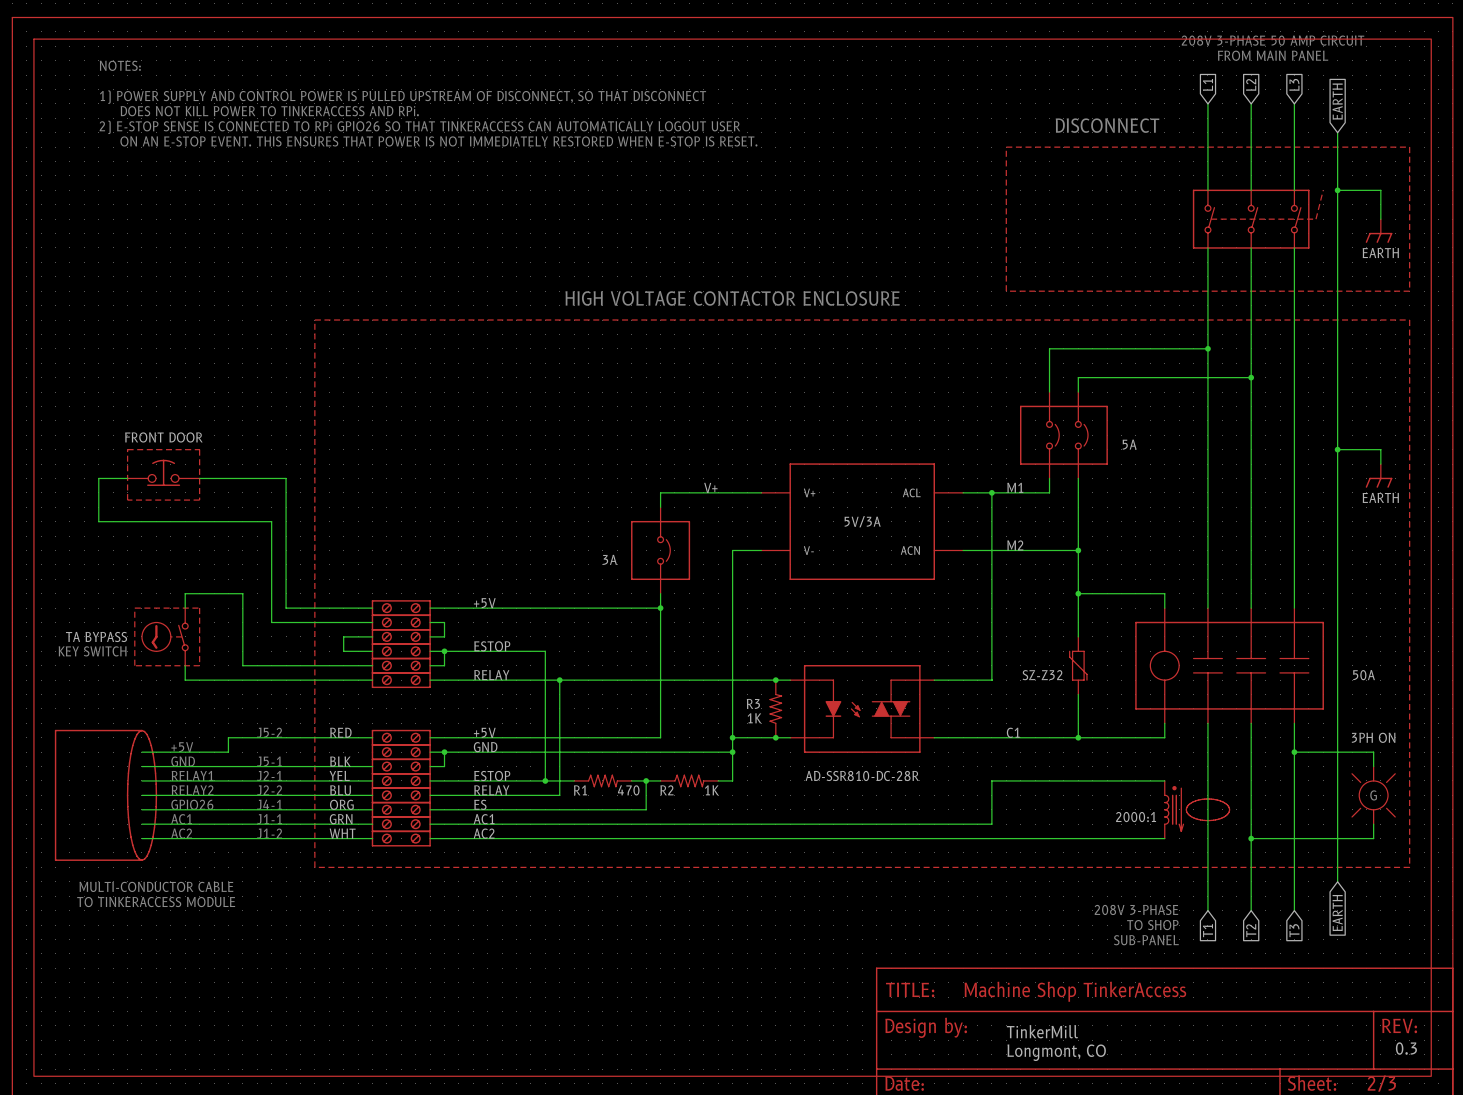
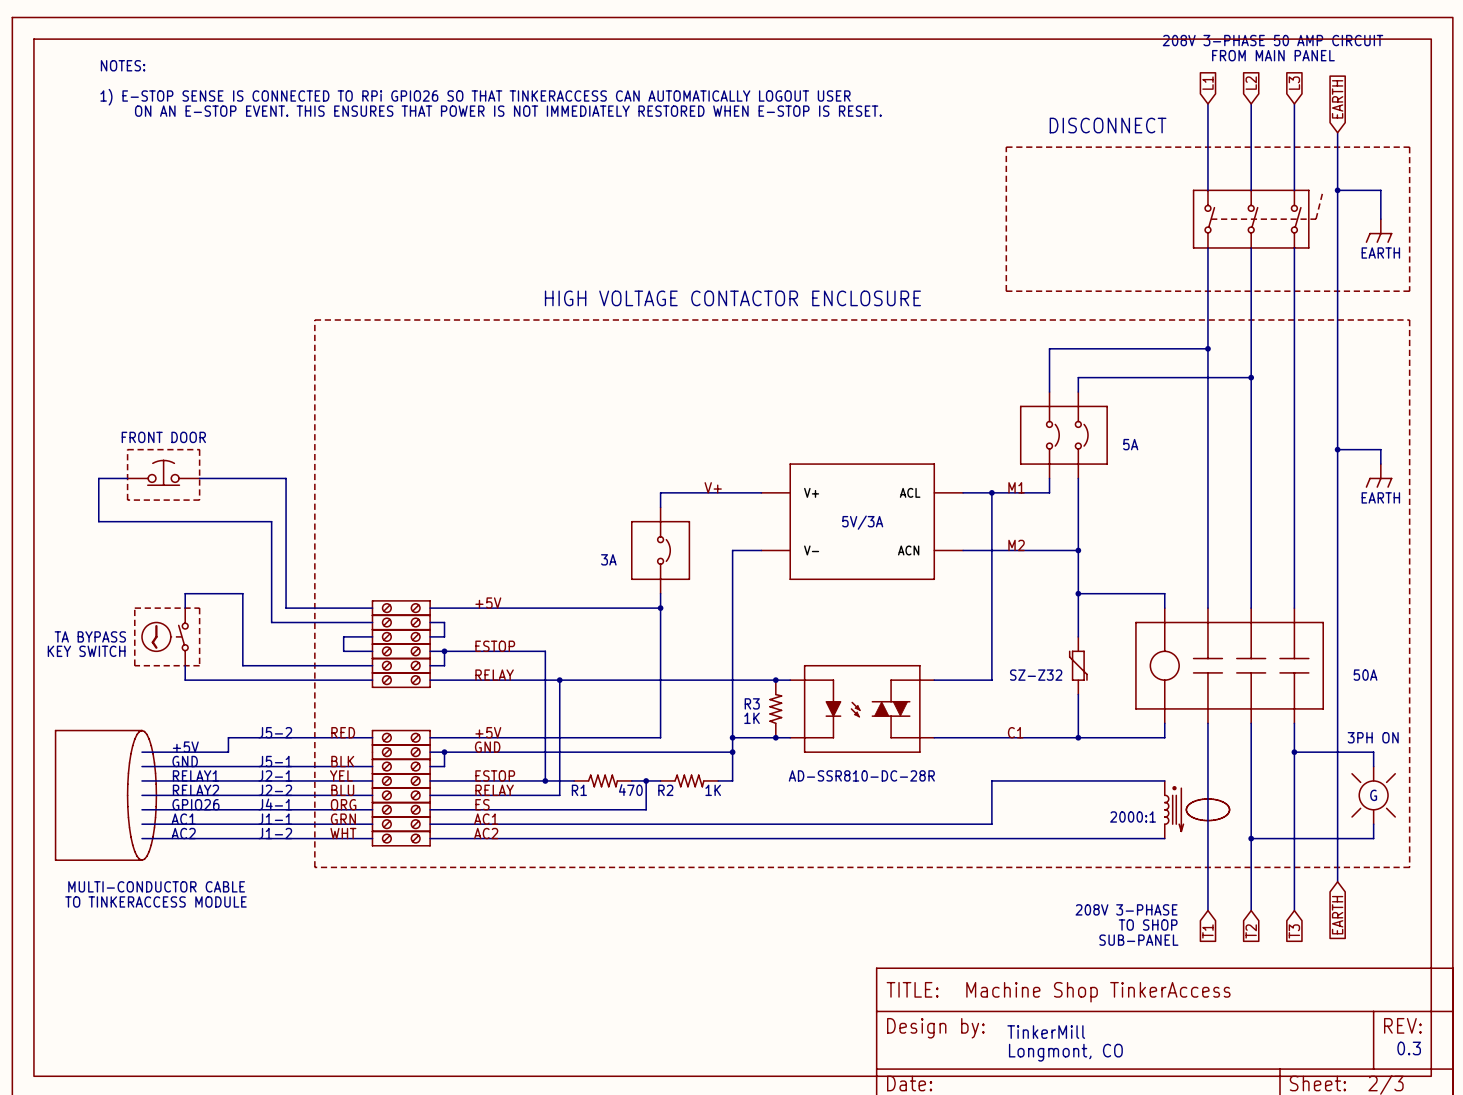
text: 1) POWER SUPPLY AND CONTROL POWER IS PULLED UPSTREAM OF DISCONNECT, SO THAT DISCONNECT (403, 97) -> 1) E-STOP SENSE IS CONNECTED TO RPi GPIO26 SO THAT TINKERACCESS CAN AUTOMATICALLY LOGOUT USER (475, 97)
text: DOES NOT KILL POWER TO TINKERACCESS AND RPi. (269, 111) -> ON AN E-STOP EVENT. THIS ENSURES THAT POWER IS NOT IMMEDIATELY RESTORED WHEN E-STOP IS RESET. (508, 111)
text: 2) E-STOP SENSE IS CONNECTED TO RPi GPIO26 SO THAT TINKERACCESS CAN AUTOMATICALLY LOGOUT USER (419, 127) -> none
text: ON AN E-STOP EVENT. THIS ENSURES THAT POWER IS NOT IMMEDIATELY RESTORED WHEN E-STOP IS RESET. (438, 141) -> none

